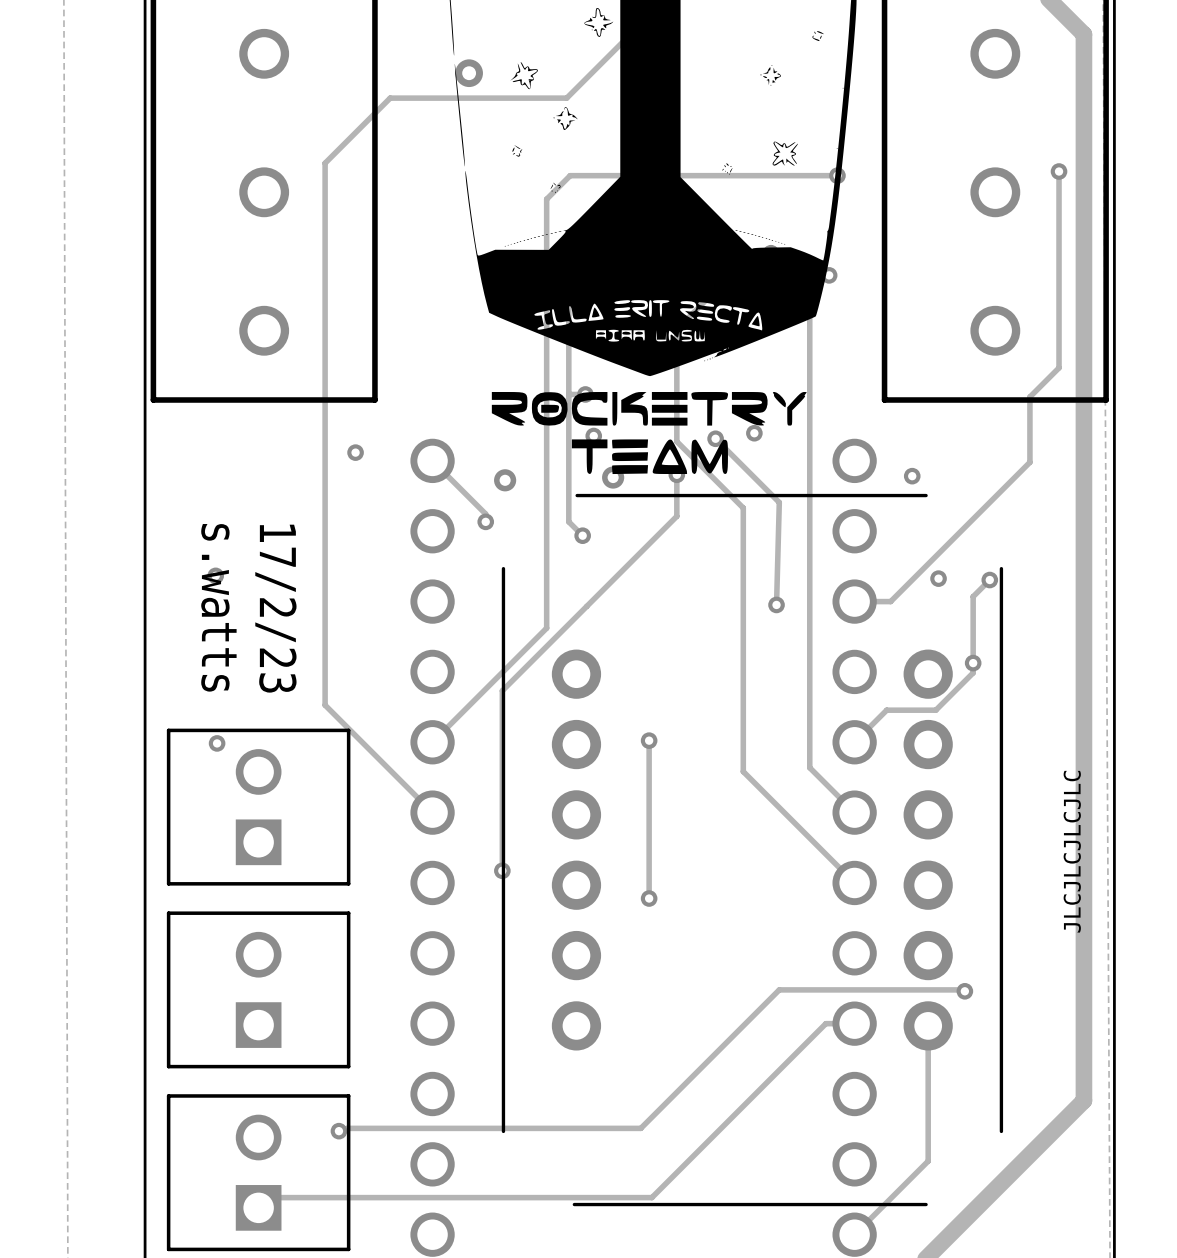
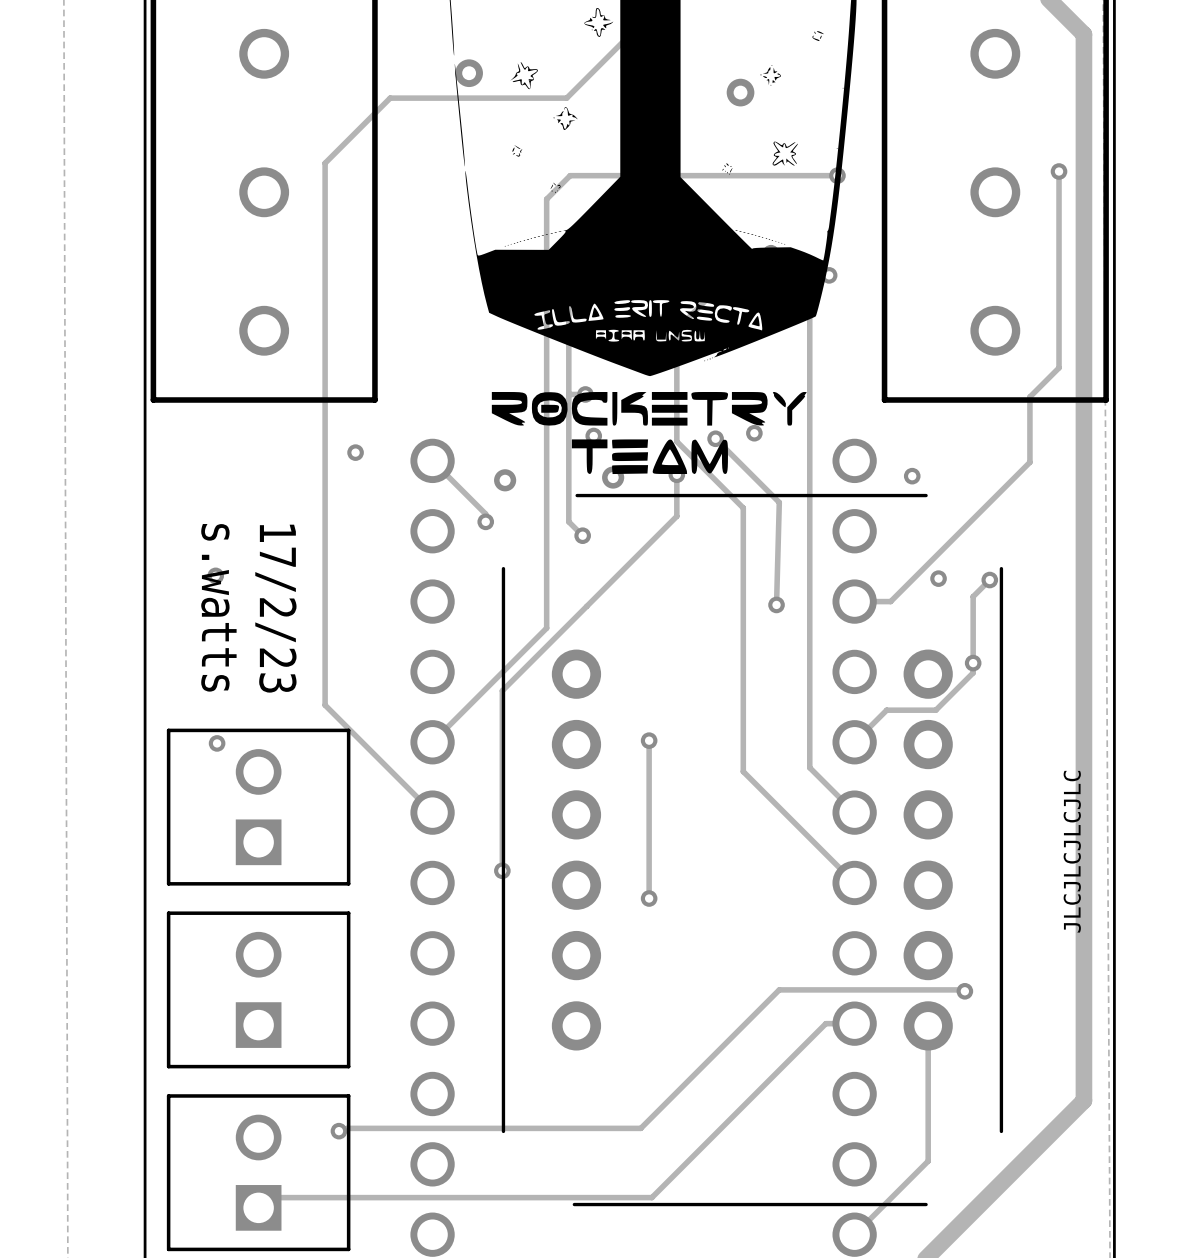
via: none -> (740, 92)

